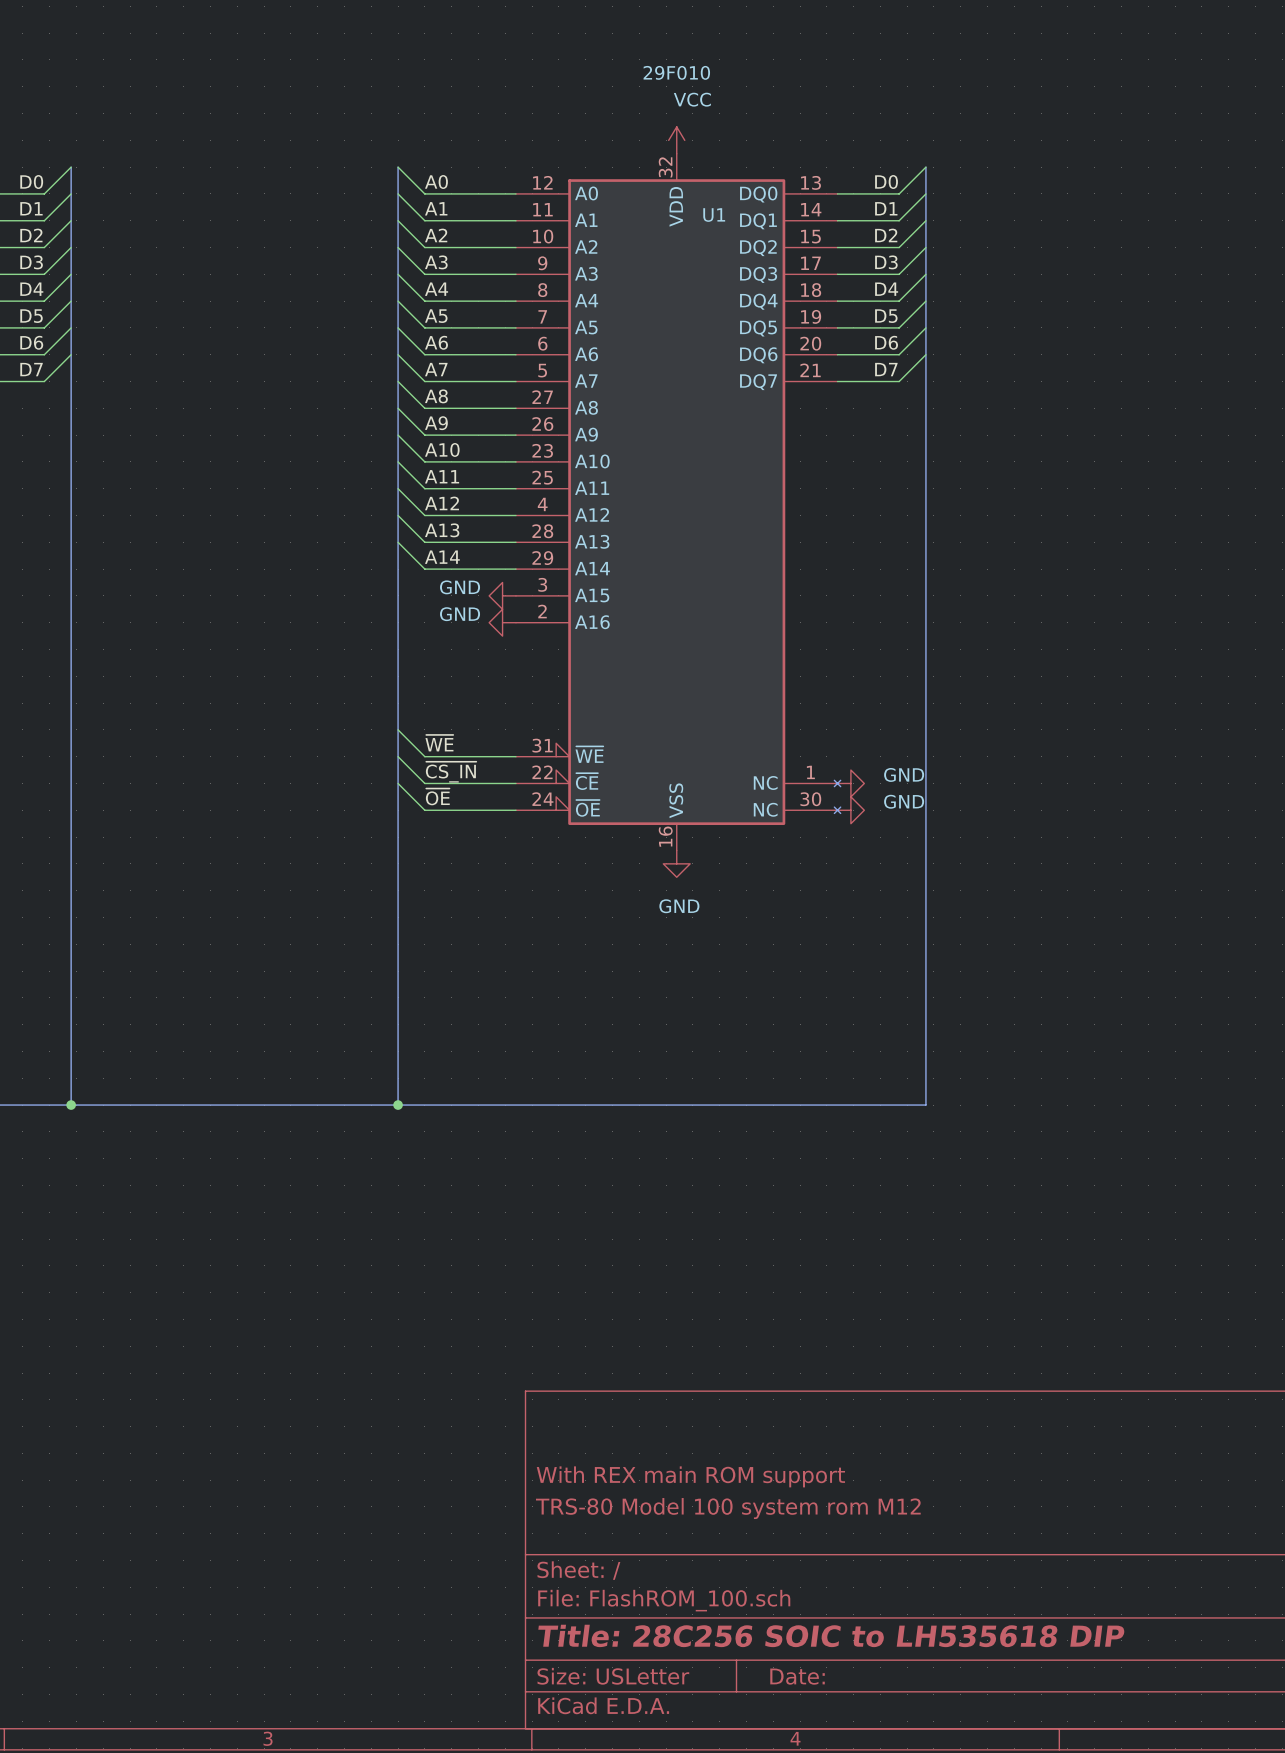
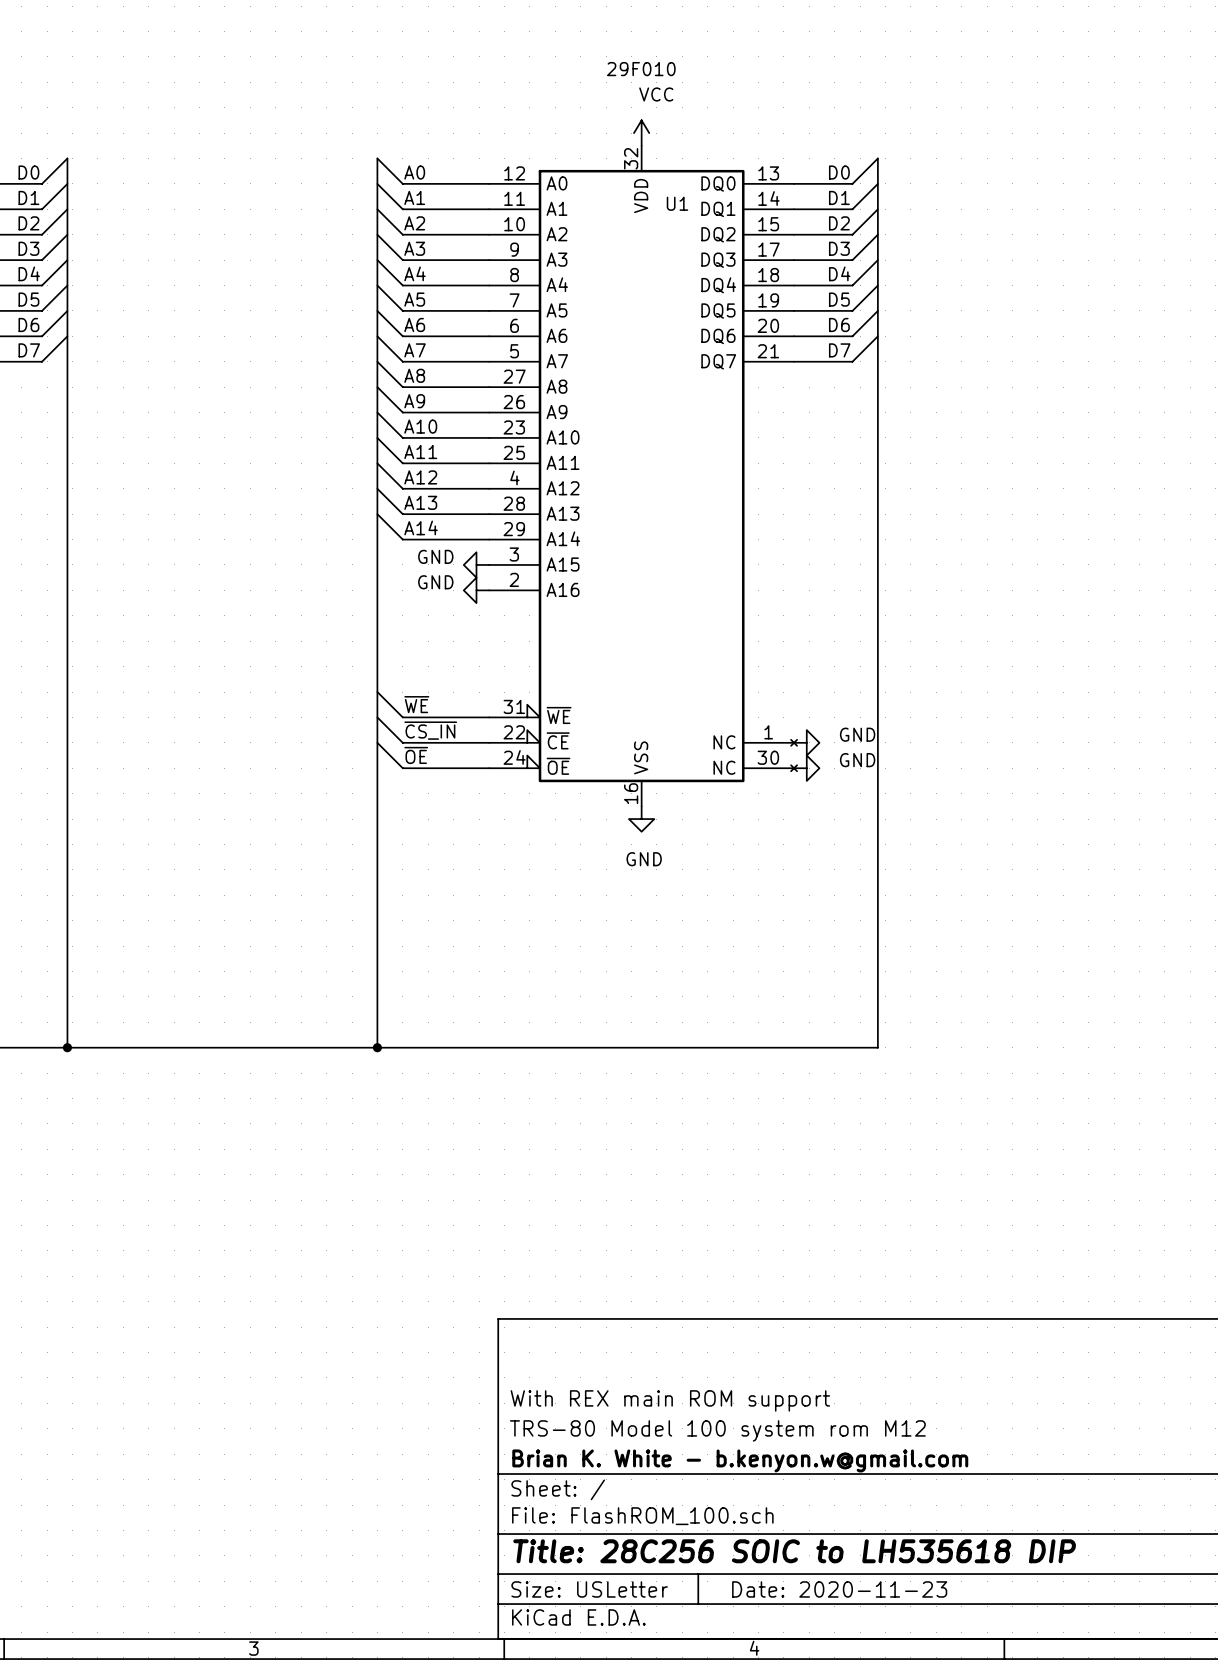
title block: none -> Brian K. White - b.kenyon.w@gmail.com (740, 1460)
title block: Date: (797, 1676) -> Date: 2020-11-23 (839, 1589)

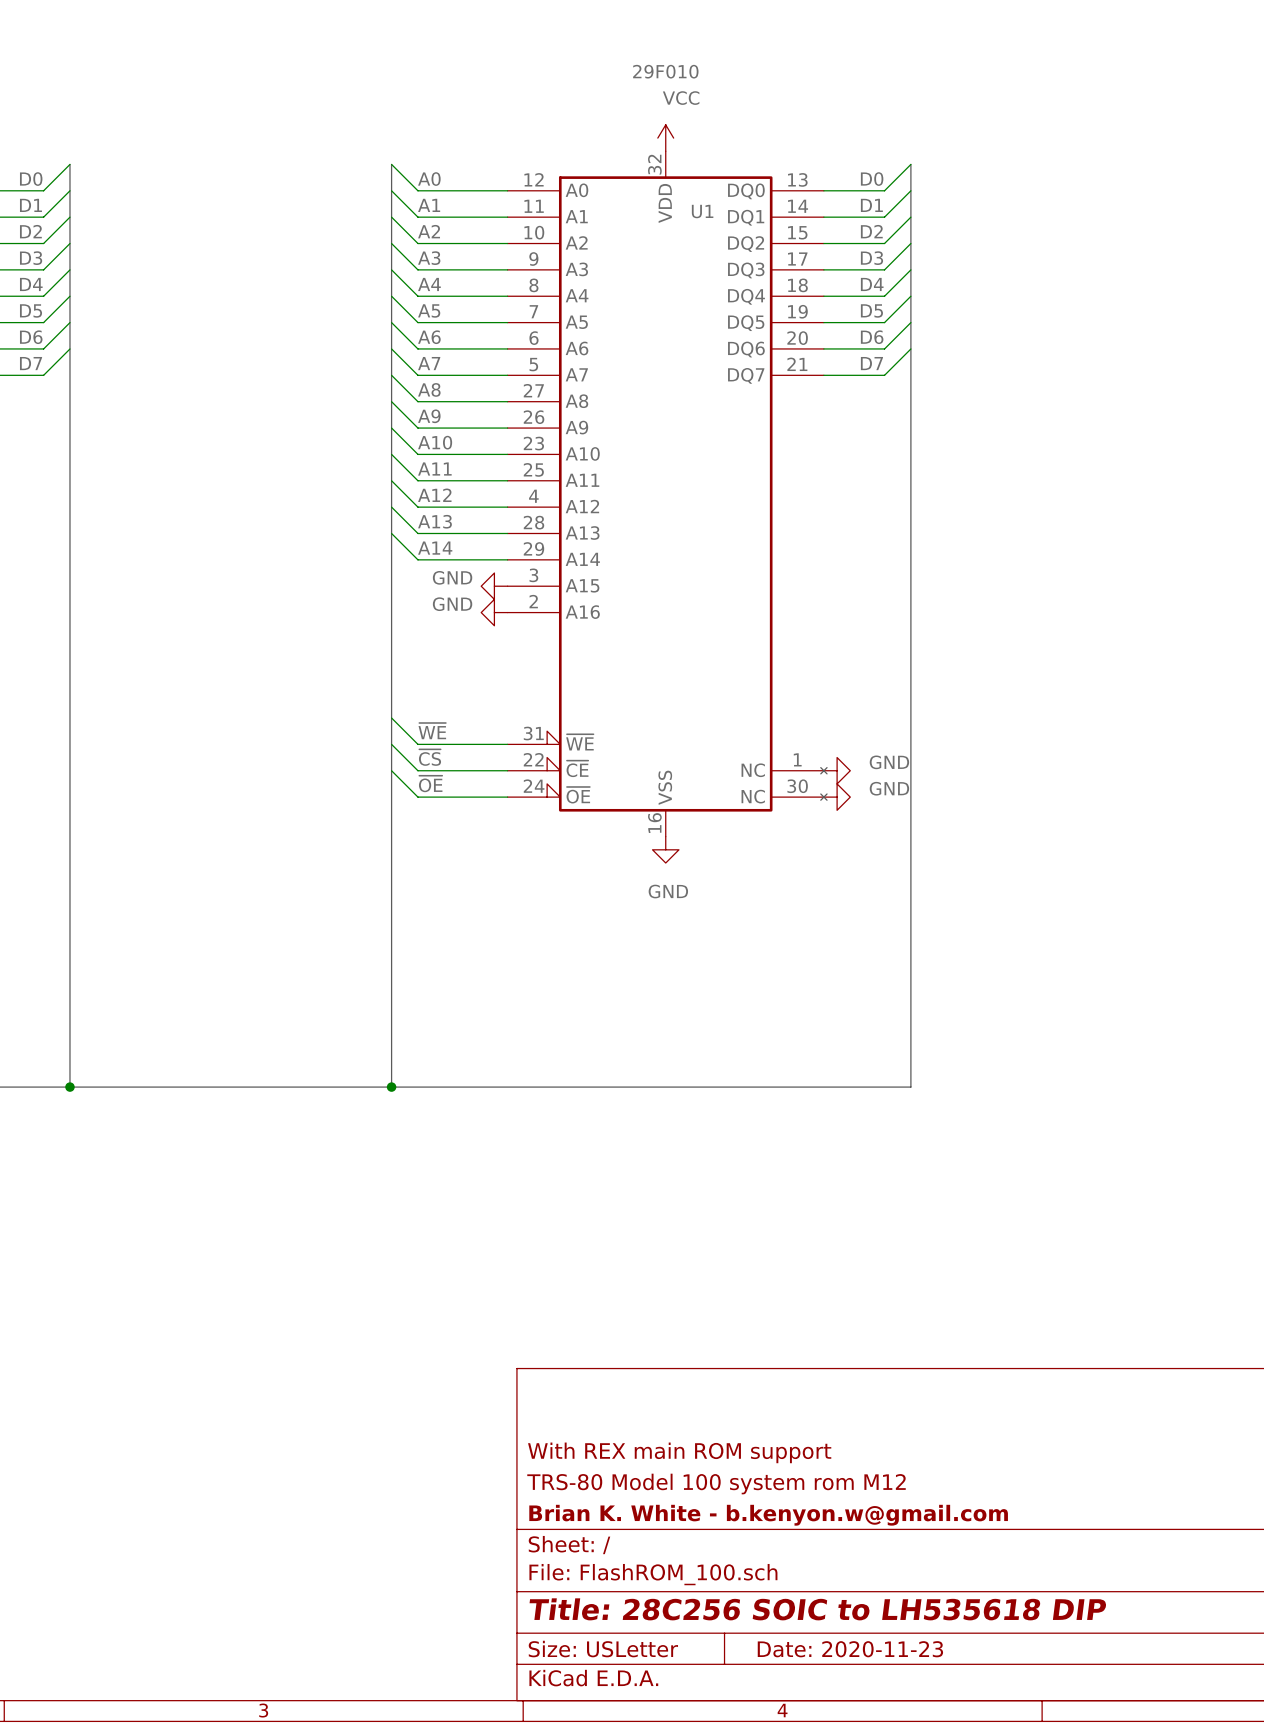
label: ~{CS_IN} (430, 730) -> ~{CS} (430, 757)

